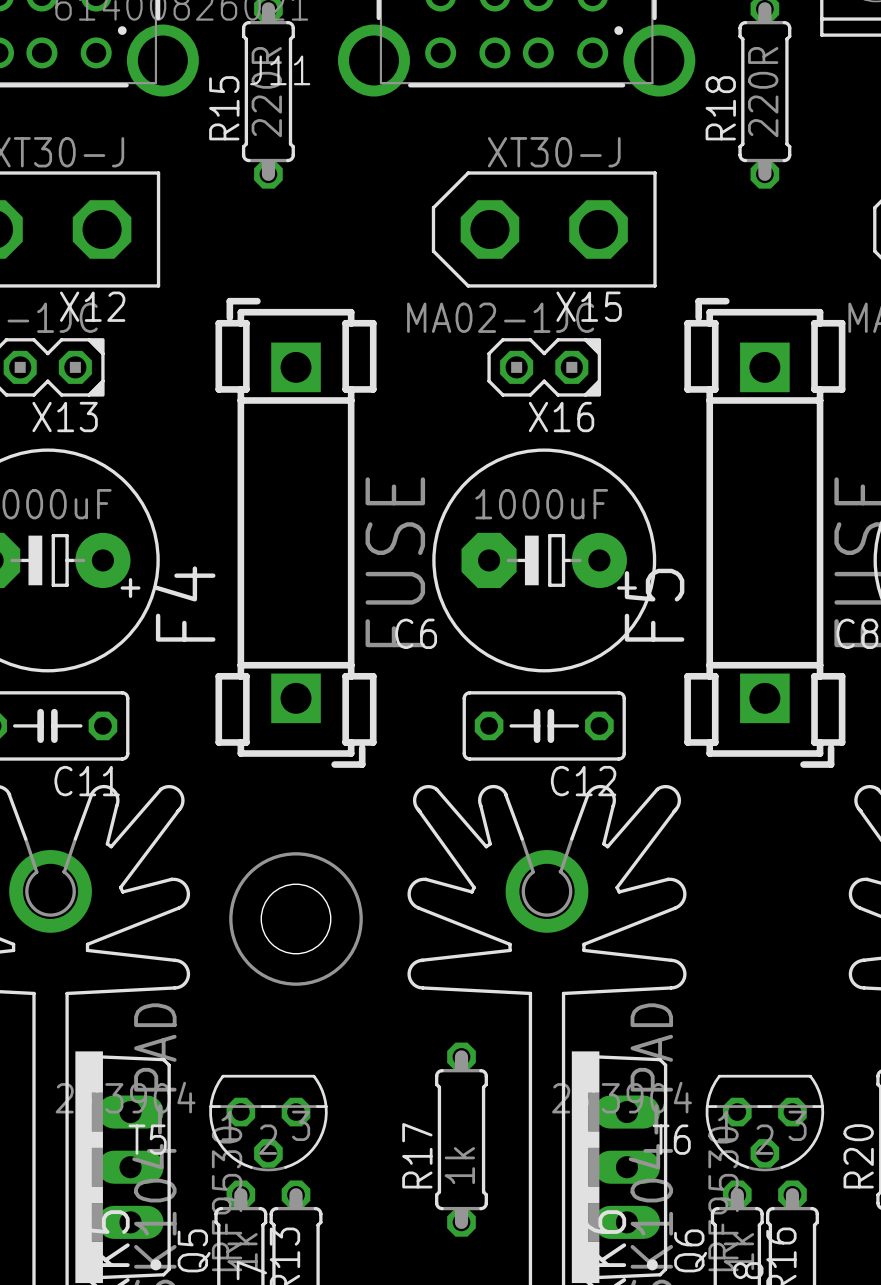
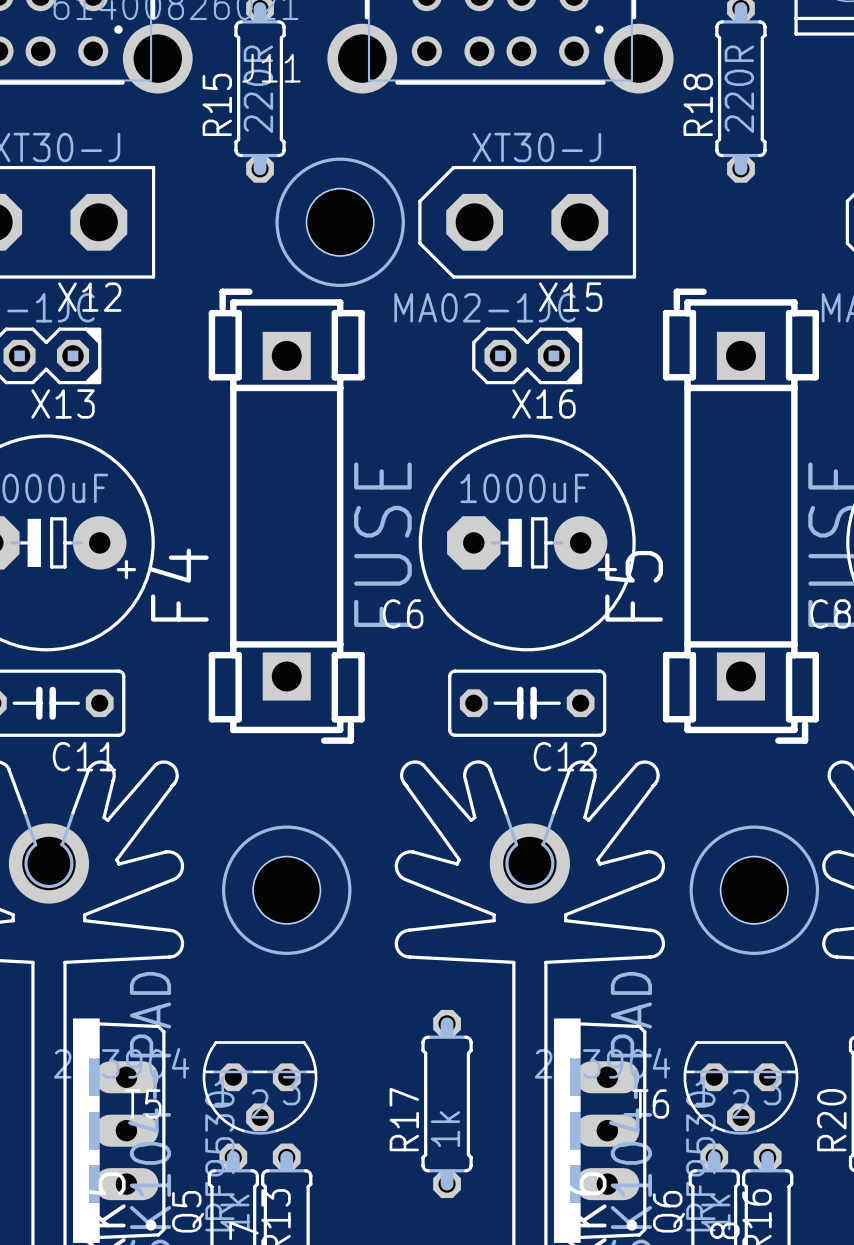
drawing: none -> [275, 157, 405, 288]
hole: none -> (340, 222)
drawing: none -> [689, 825, 820, 955]
hole: none -> (754, 890)

